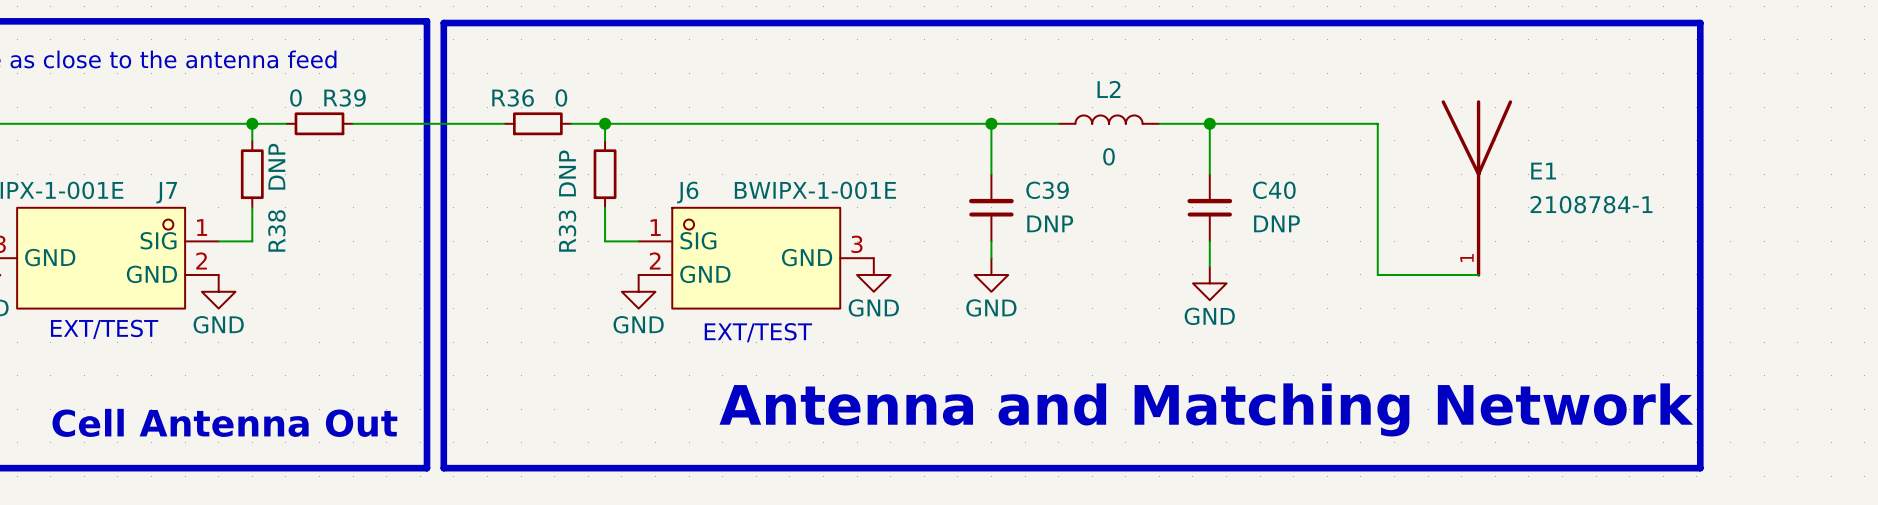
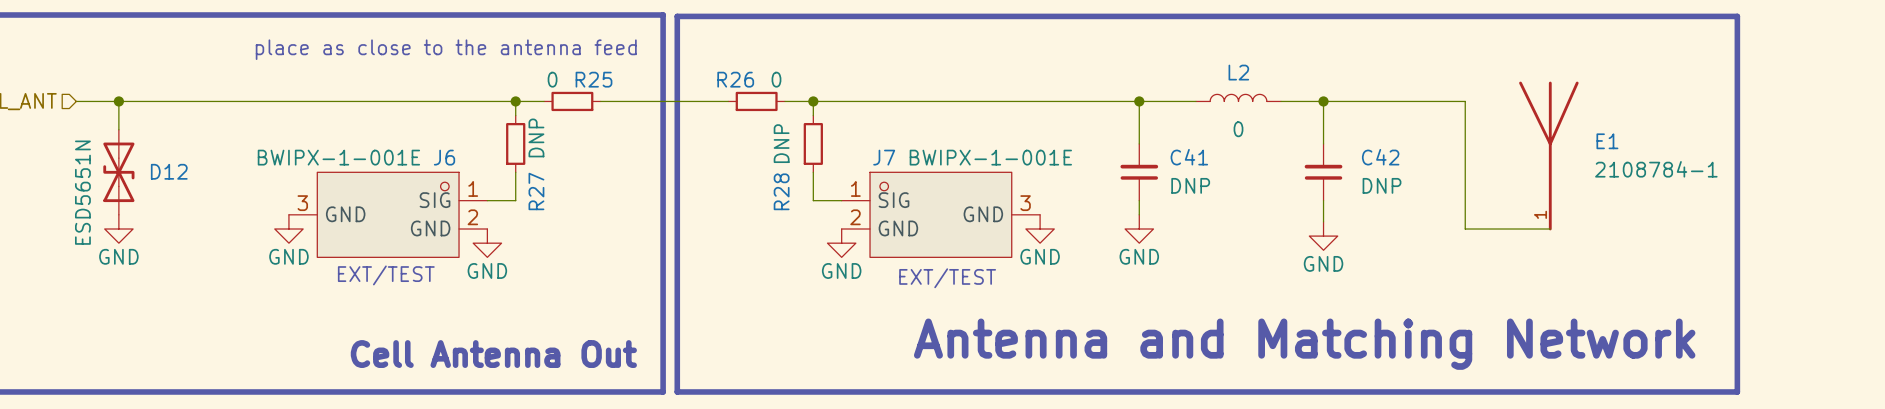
R39 name: R39 (345, 97) -> R25 (593, 79)
R36 name: R36 (513, 97) -> R26 (735, 79)
C39 name: C39 (1047, 190) -> C41 (1189, 157)
C40 name: C40 (1274, 190) -> C42 (1380, 157)
J7 name: J7 (166, 192) -> J6 (444, 157)
J6 name: J6 (687, 192) -> J7 (884, 157)
R38 name: R38 (276, 230) -> R27 (536, 191)
R33 name: R33 (567, 231) -> R28 (781, 191)

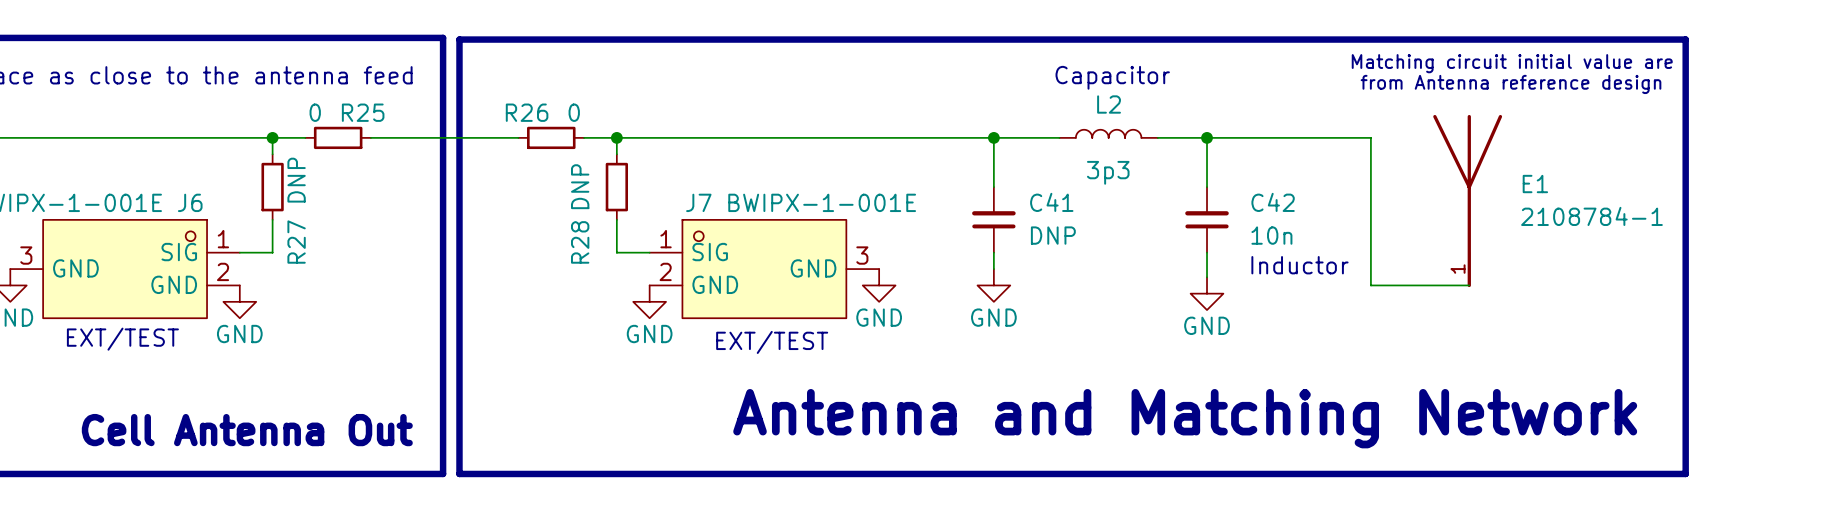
text: none -> Matching circuit initial value are (1512, 63)
text: none -> Capacitor (1112, 77)
text: none -> from Antenna reference design (1510, 84)
L2 value: 0 (1238, 129) -> 3p3 (1108, 172)
C42 value: DNP (1382, 185) -> 10n (1271, 235)
text: none -> Inductor (1299, 265)

